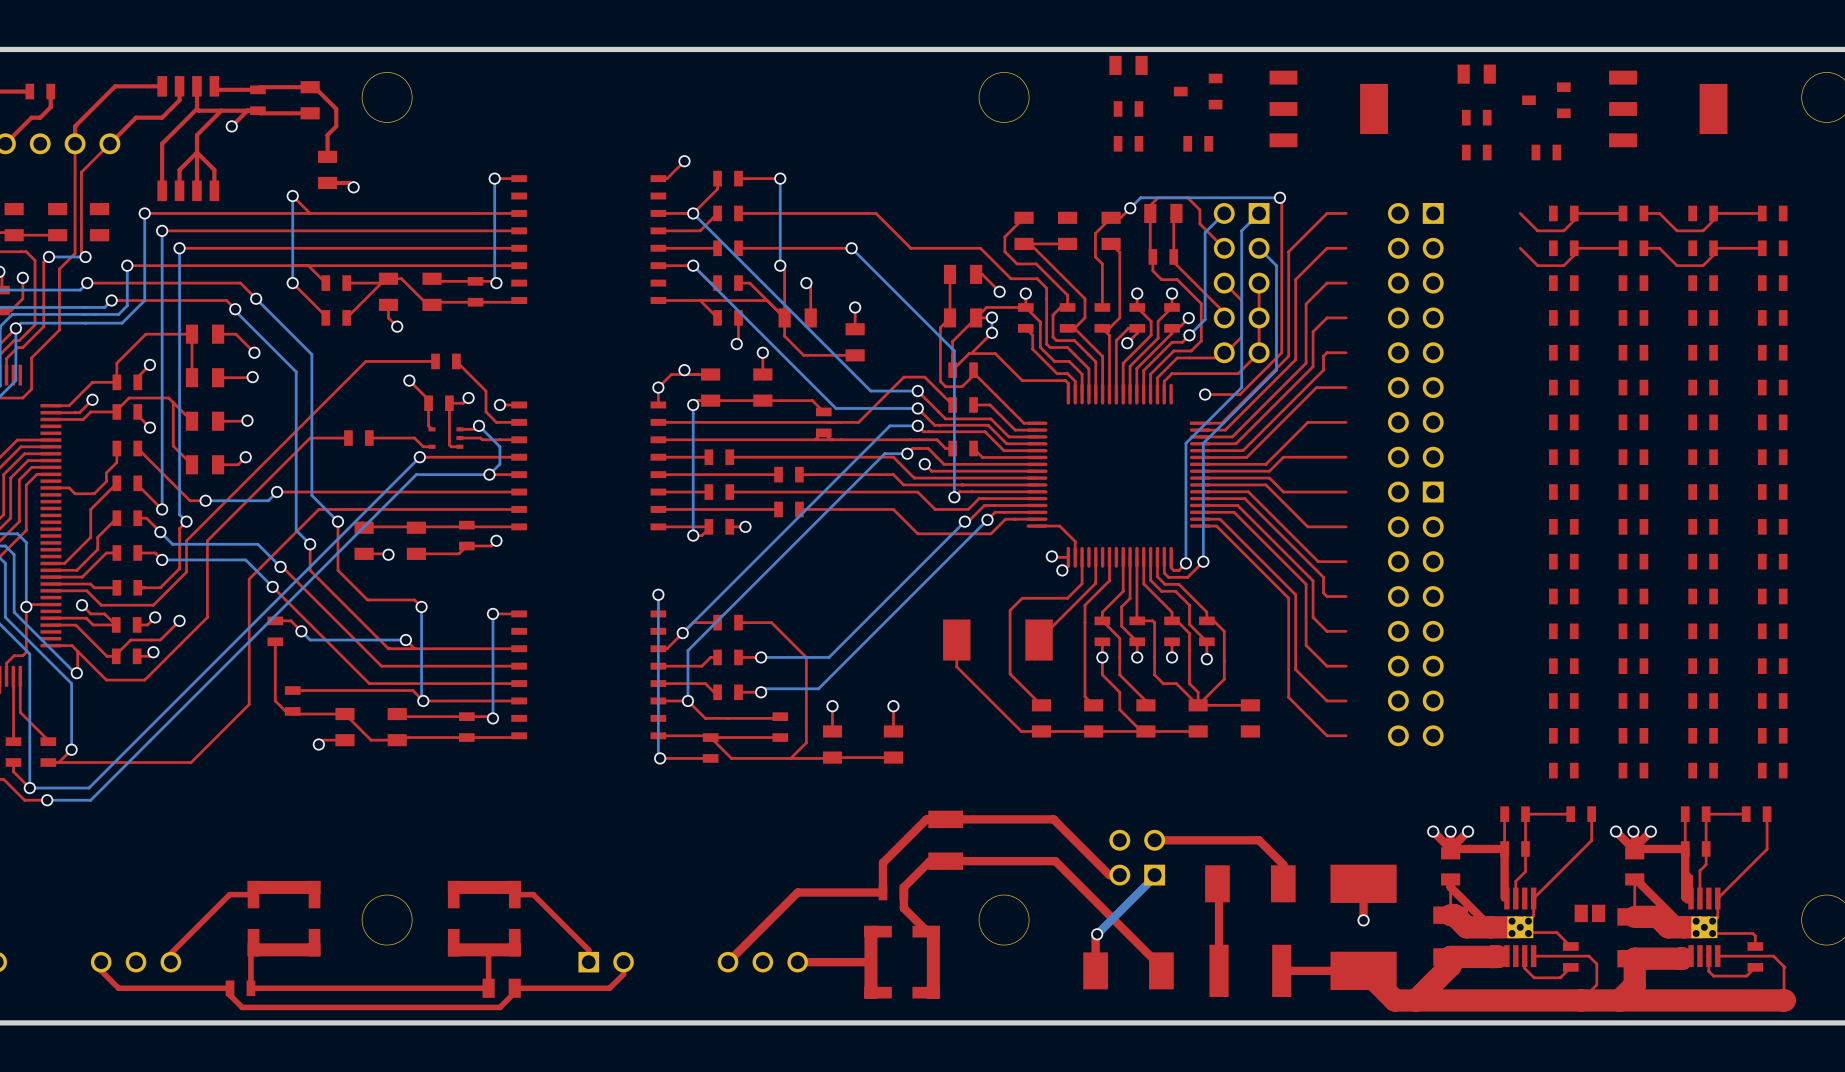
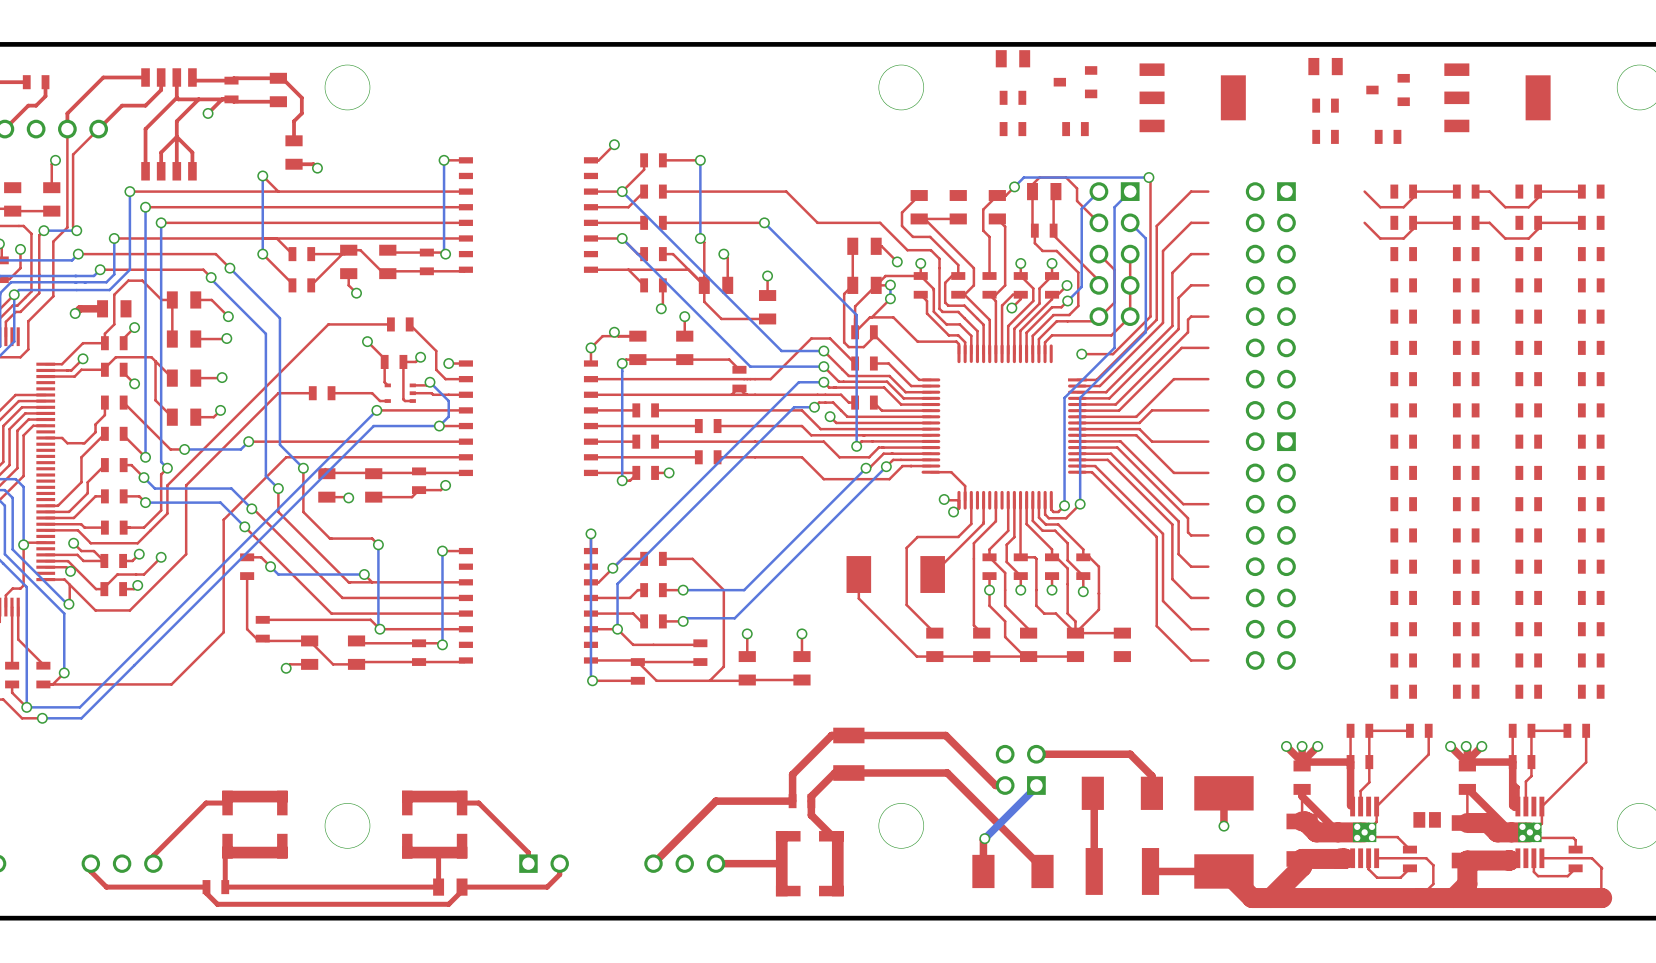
top track: none -> (55, 160) (51, 164) (51, 187)
via: none -> (55, 160)
part rotation: 0° (99, 222) -> 90° clockwise (114, 308)
part position: (99, 222) -> (114, 308)
top track: (180, 334) (145, 334) (116, 363) (116, 371) -> (161, 299) (142, 280) (128, 280) (114, 294) (114, 324) (104, 333)
top track: none -> (102, 308) (79, 308) (75, 313)
via: none -> (75, 313)
top track: none -> (45, 567) (66, 567) (70, 571)
via: none -> (70, 571)

